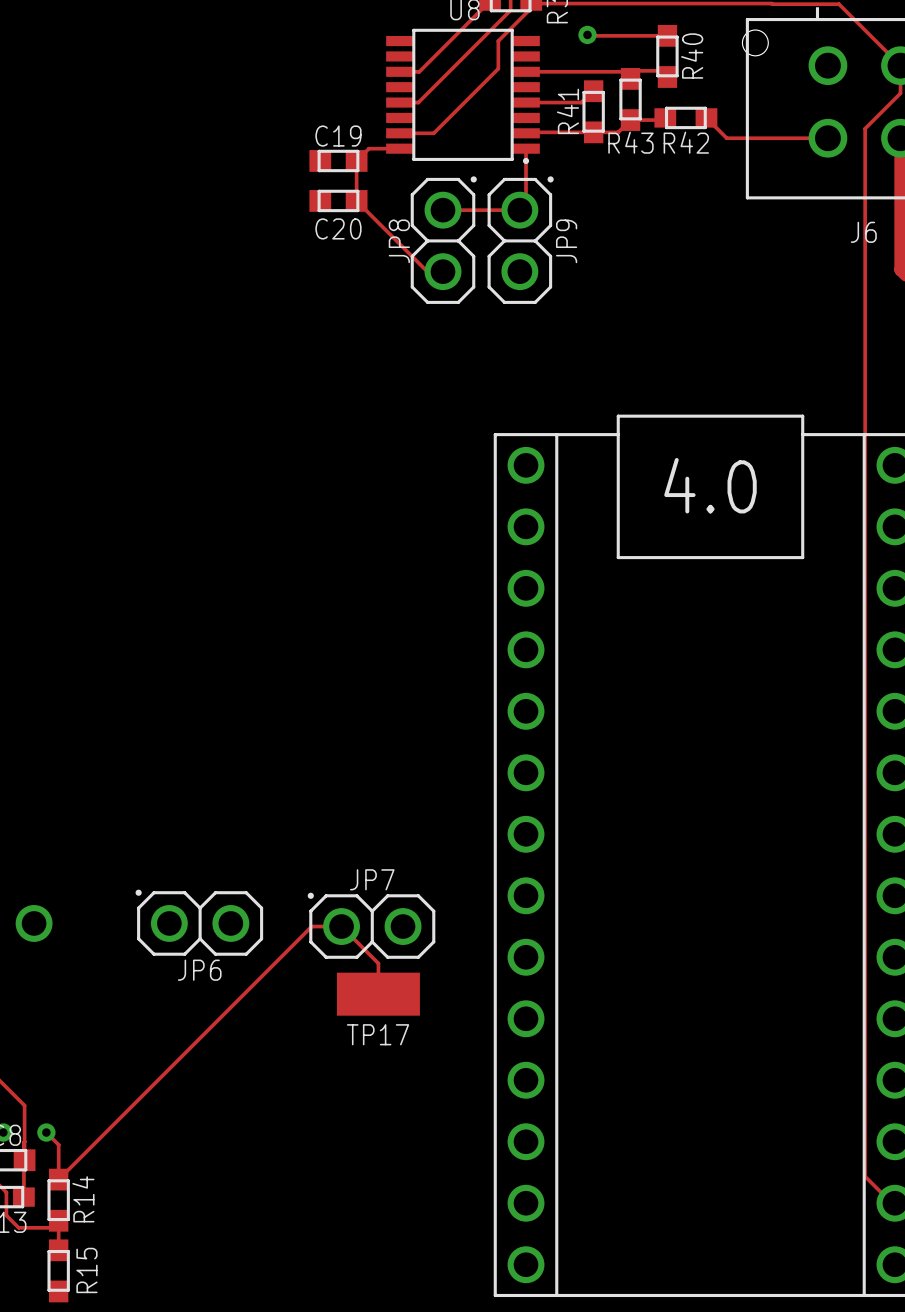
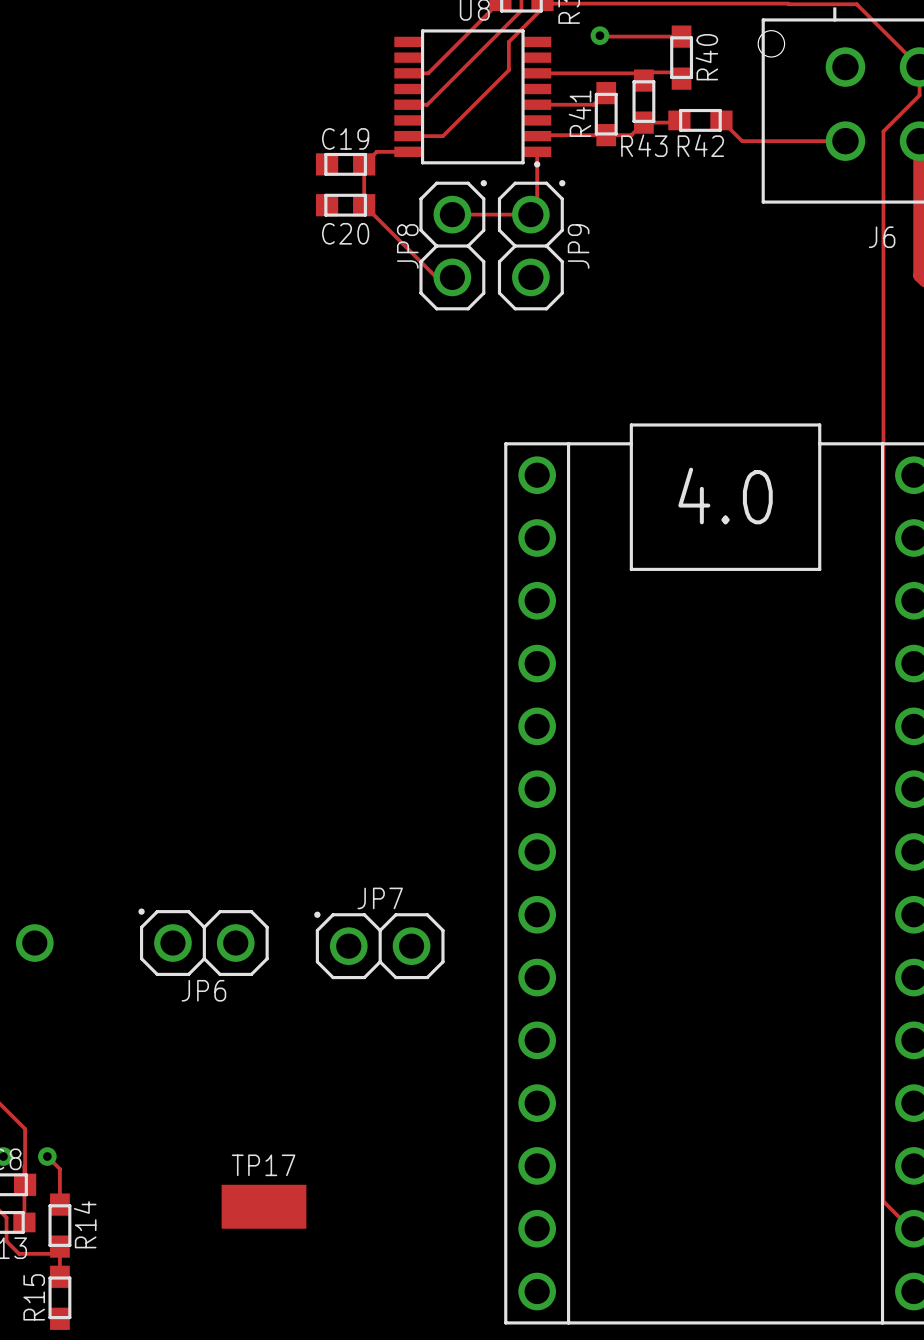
track: (378, 994) (378, 963) (341, 926) (311, 926) (58, 1179) -> none
TP17 position: (378, 994) -> (264, 1206)
TP17 name position: TP17 (378, 1034) -> TP17 (263, 1165)
R15 name position: R15 (86, 1270) -> R15 (34, 1297)

